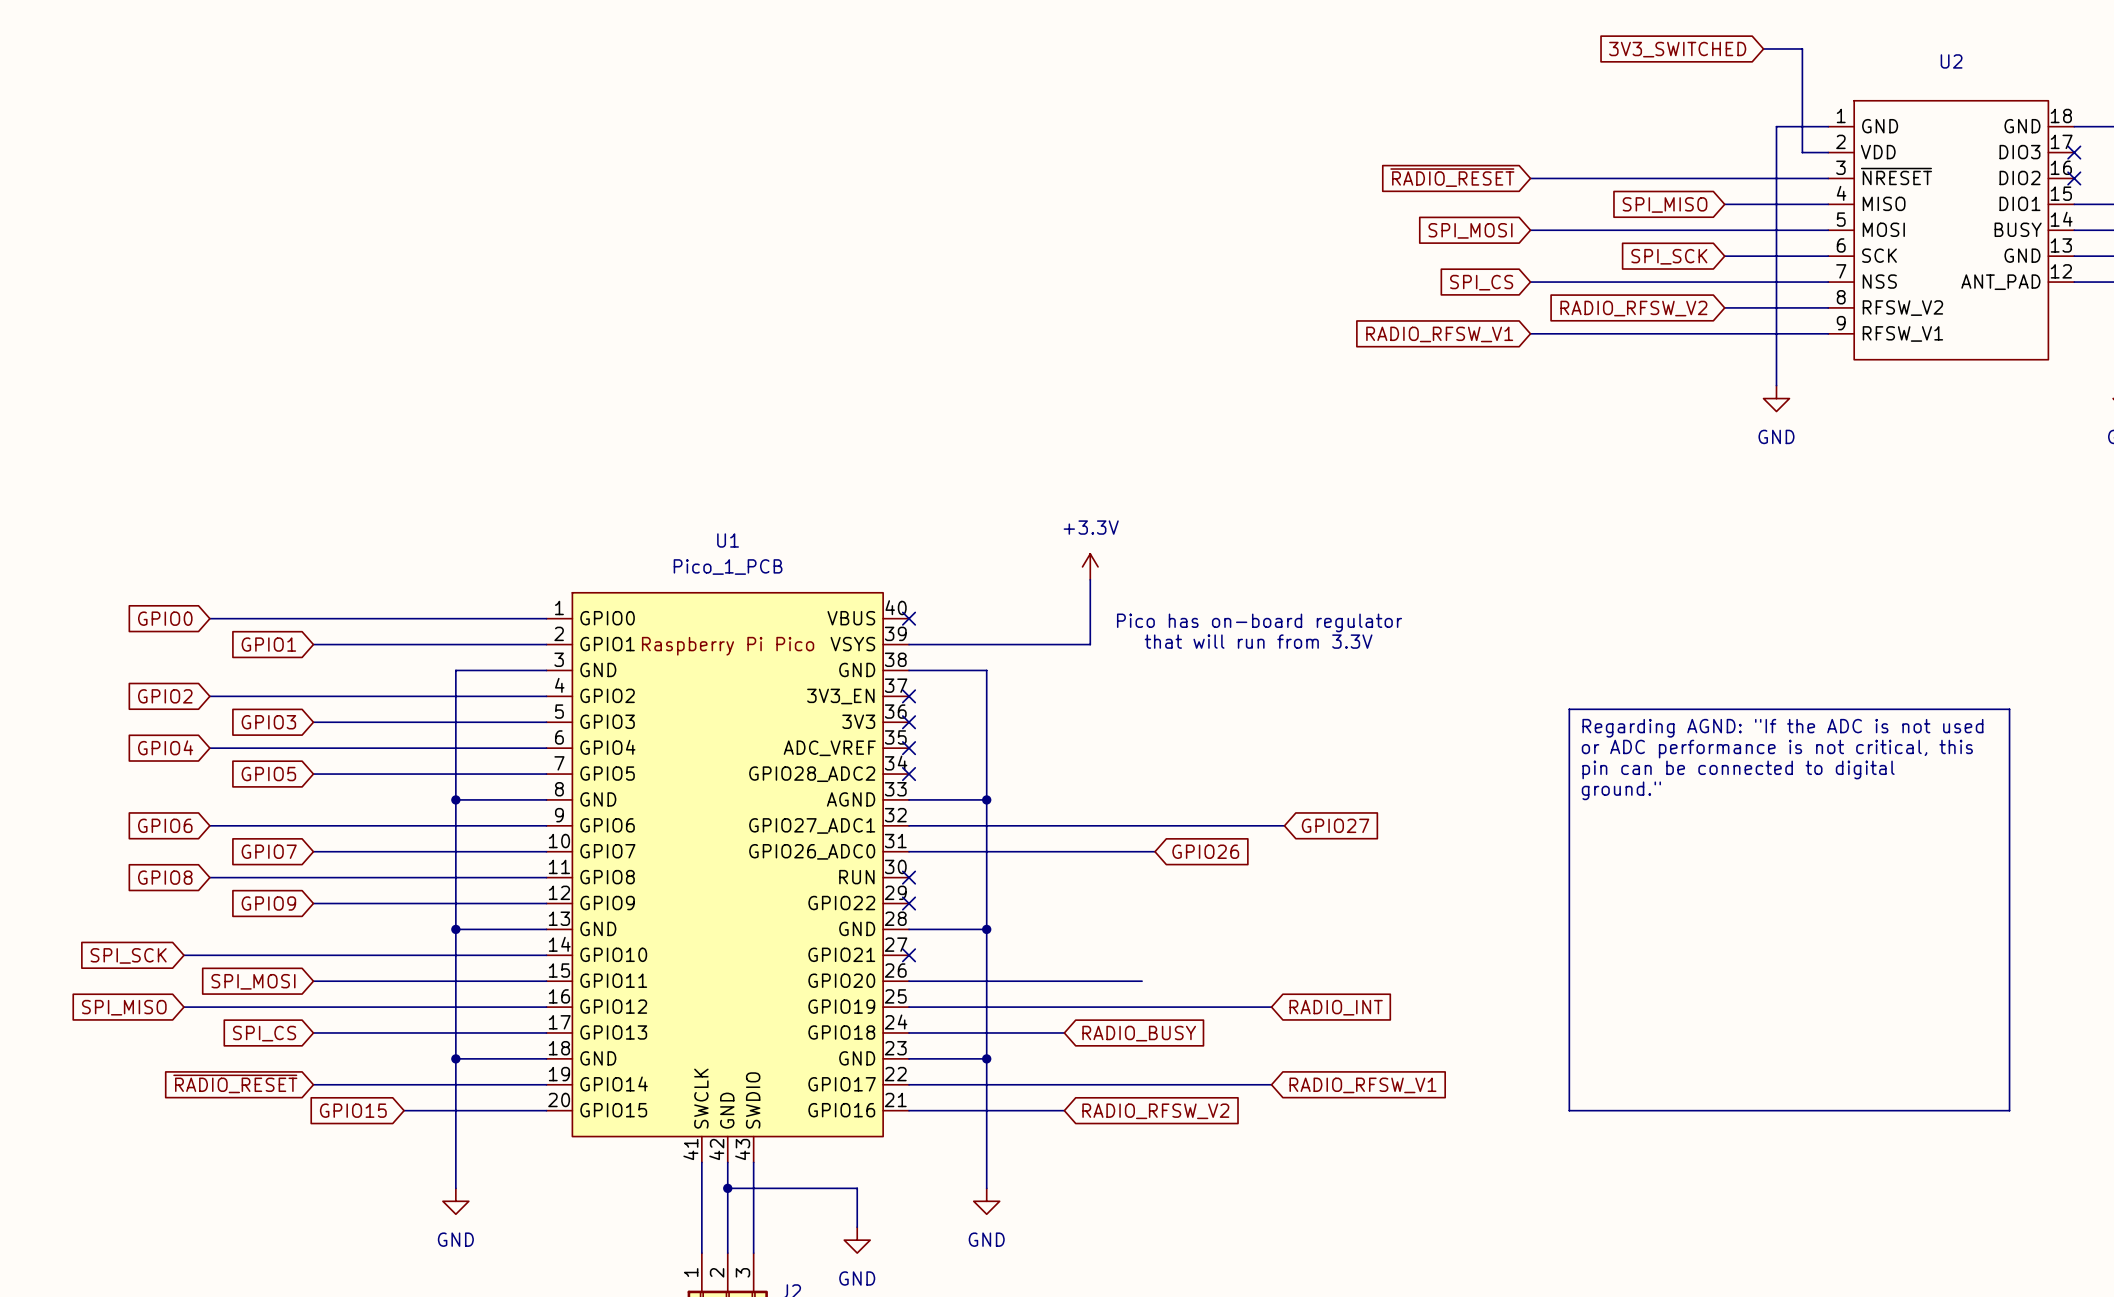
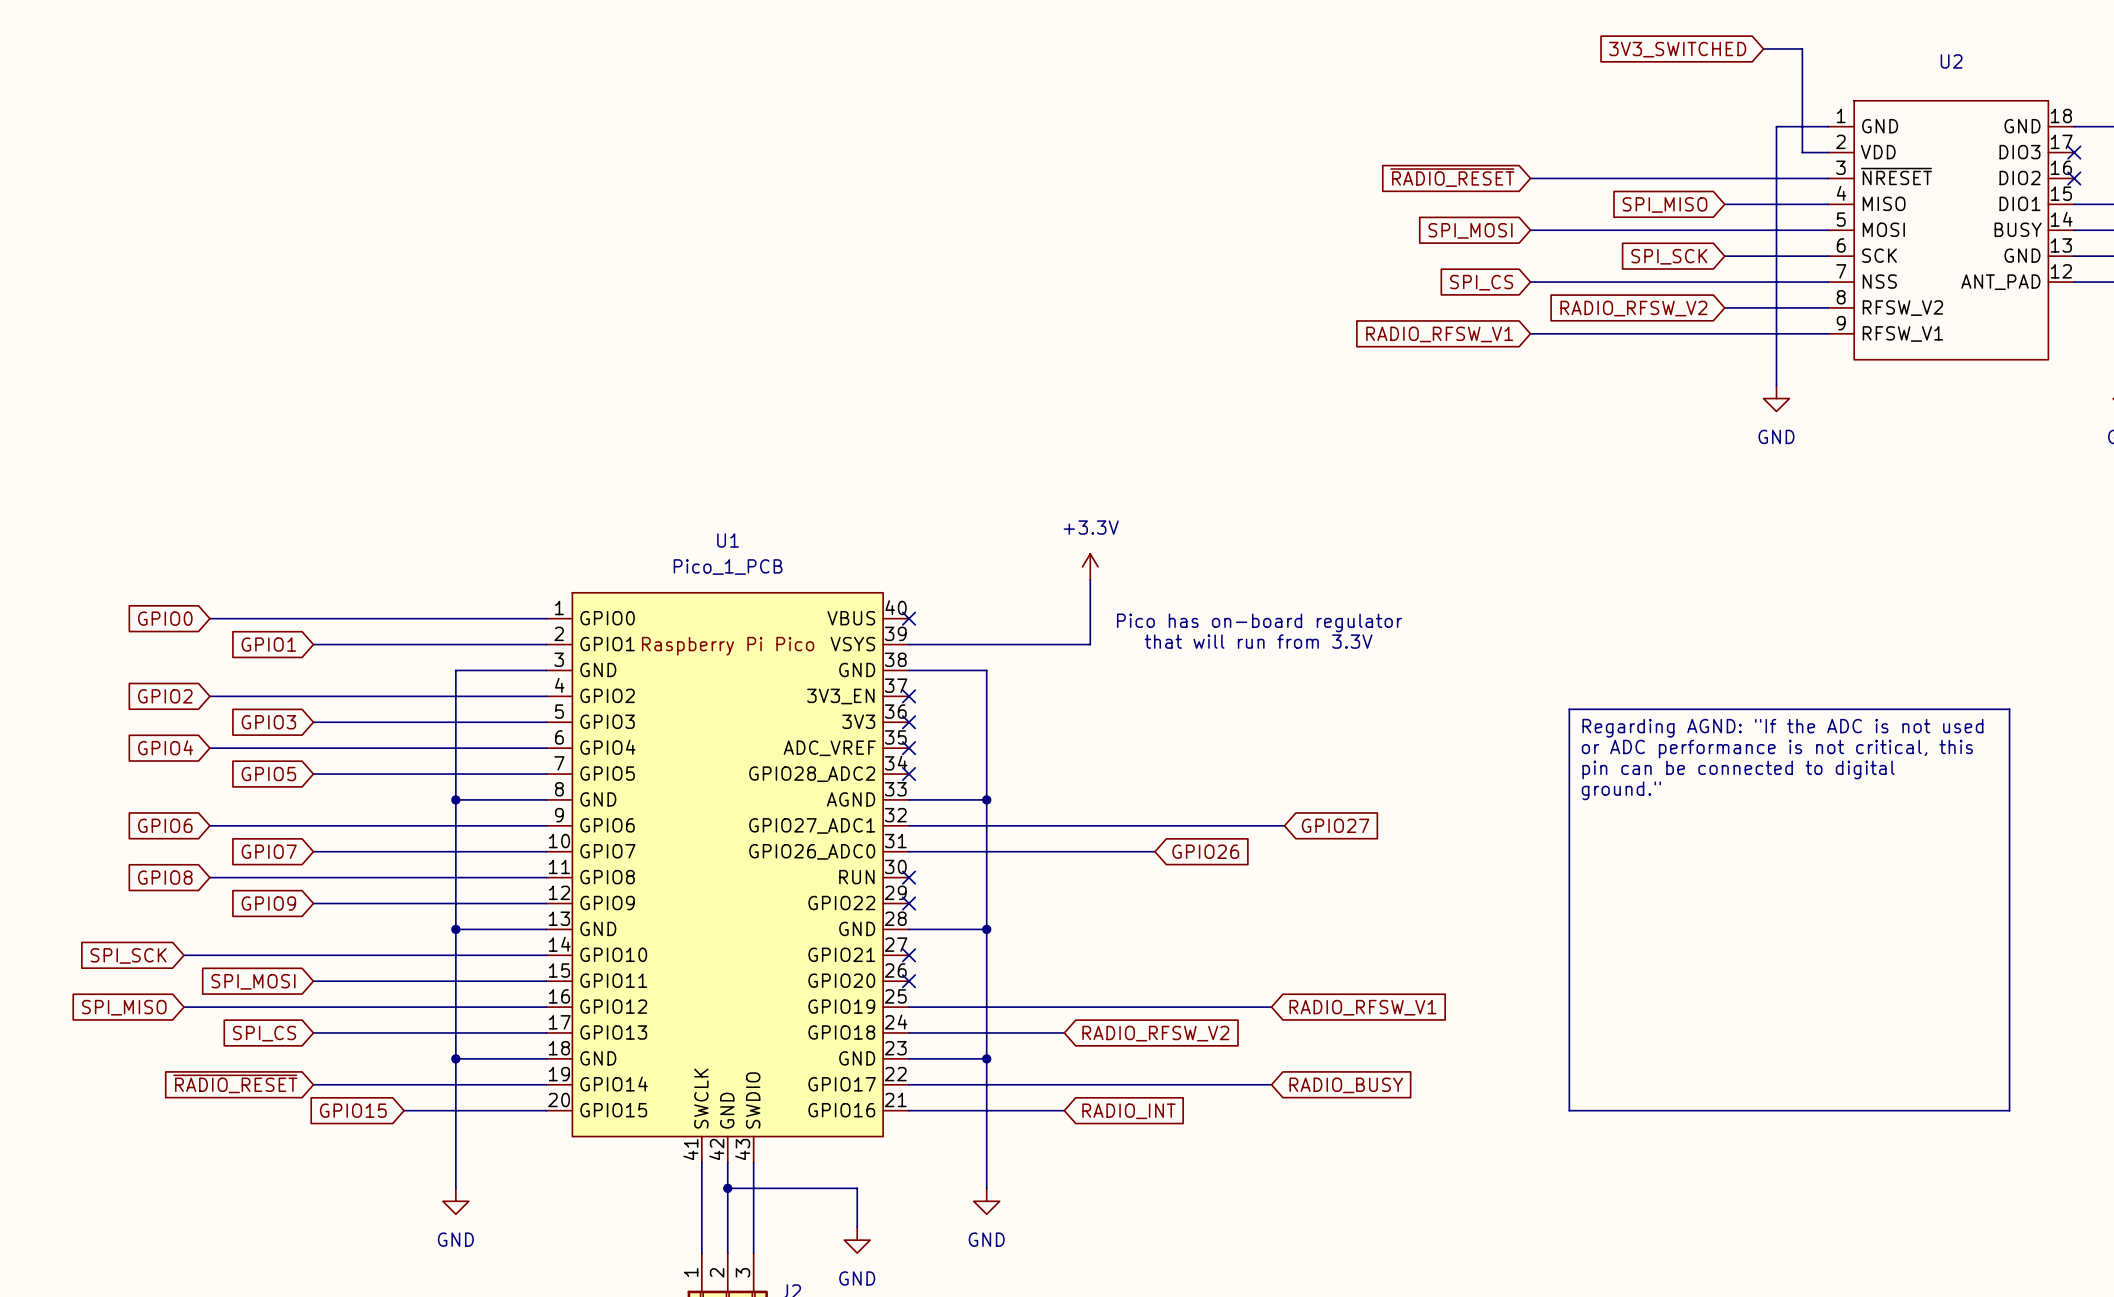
wire: (909, 981) (1142, 981) -> none
no-connect mark: none -> (909, 981)
global label: RADIO_INT (1336, 1007) -> RADIO_RFSW_V1 (1362, 1007)
global label: RADIO_BUSY (1139, 1033) -> RADIO_RFSW_V2 (1155, 1033)
global label: RADIO_RFSW_V1 (1362, 1085) -> RADIO_BUSY (1346, 1085)
global label: RADIO_RFSW_V2 (1155, 1111) -> RADIO_INT (1128, 1111)

